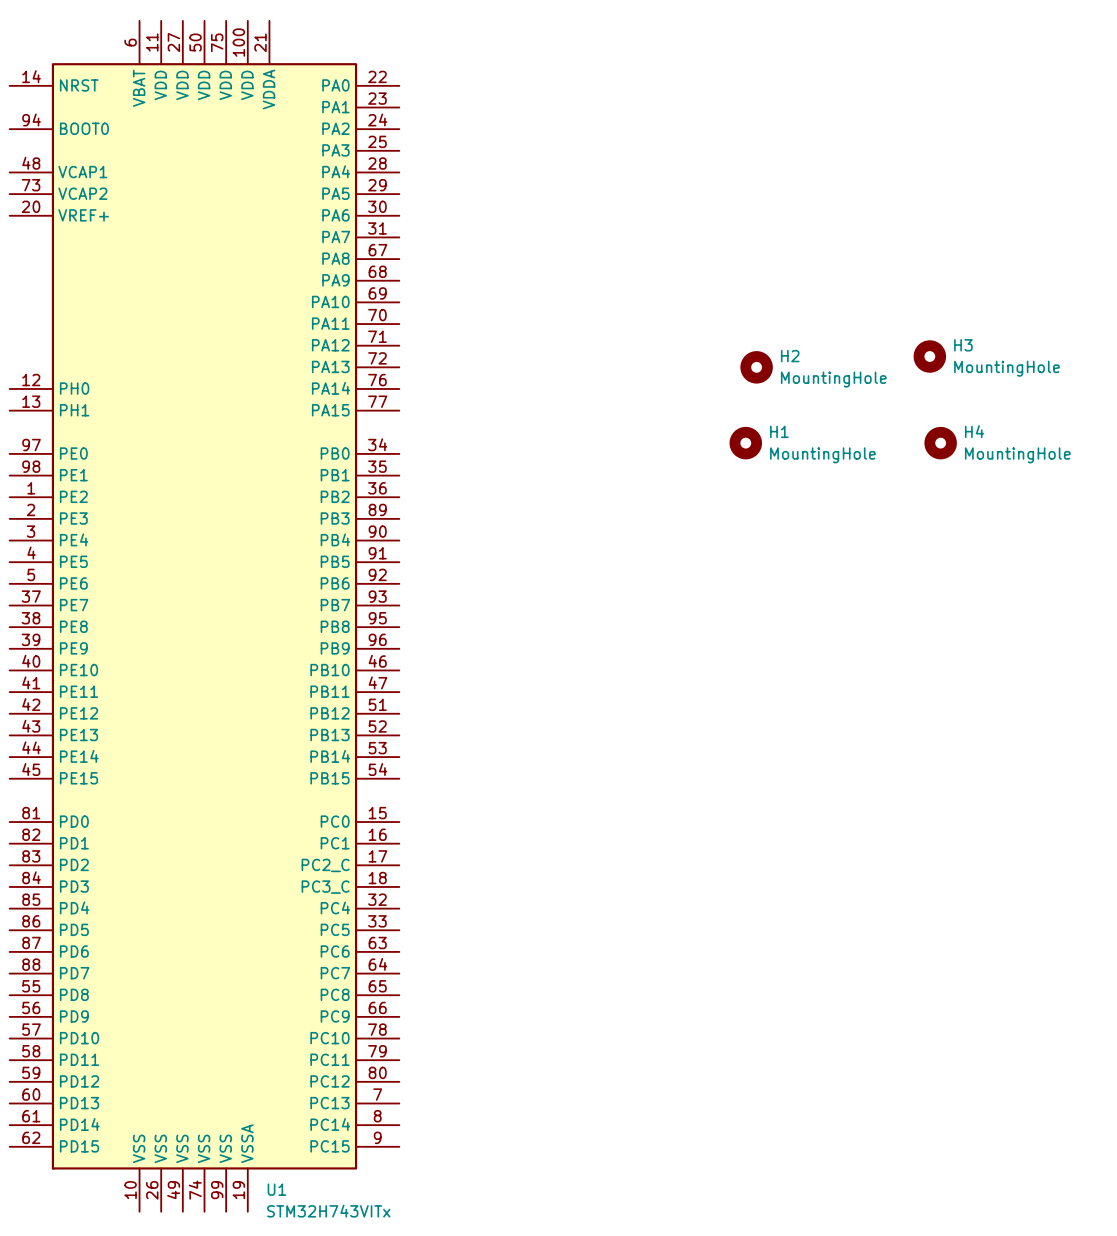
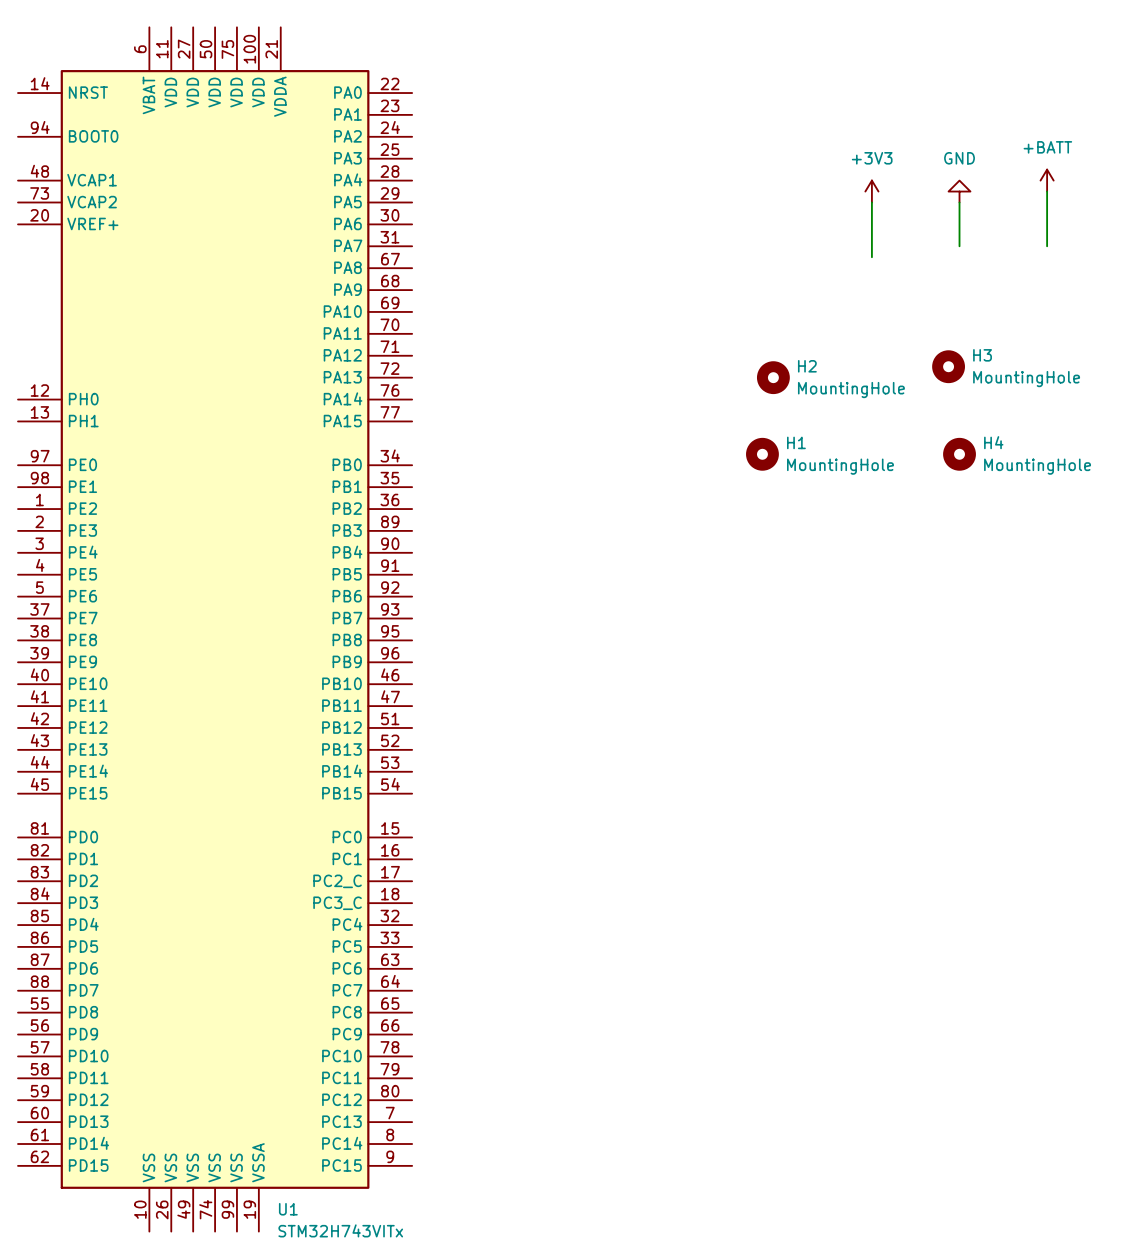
power symbol: none -> +BATT (1047, 180)
power symbol: none -> +3V3 (871, 191)
power symbol: none -> GND (959, 191)
wire: none -> (1047, 191) (1047, 246)
wire: none -> (871, 202) (871, 257)
wire: none -> (959, 202) (959, 246)

